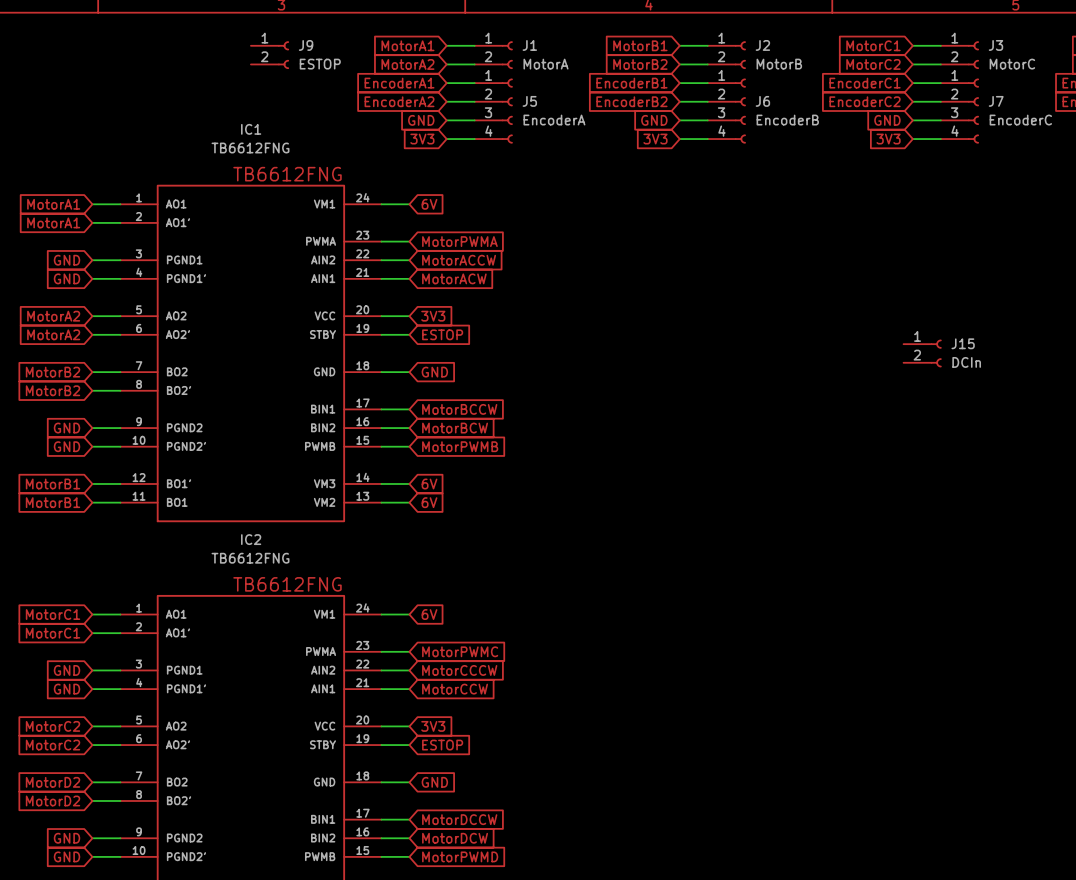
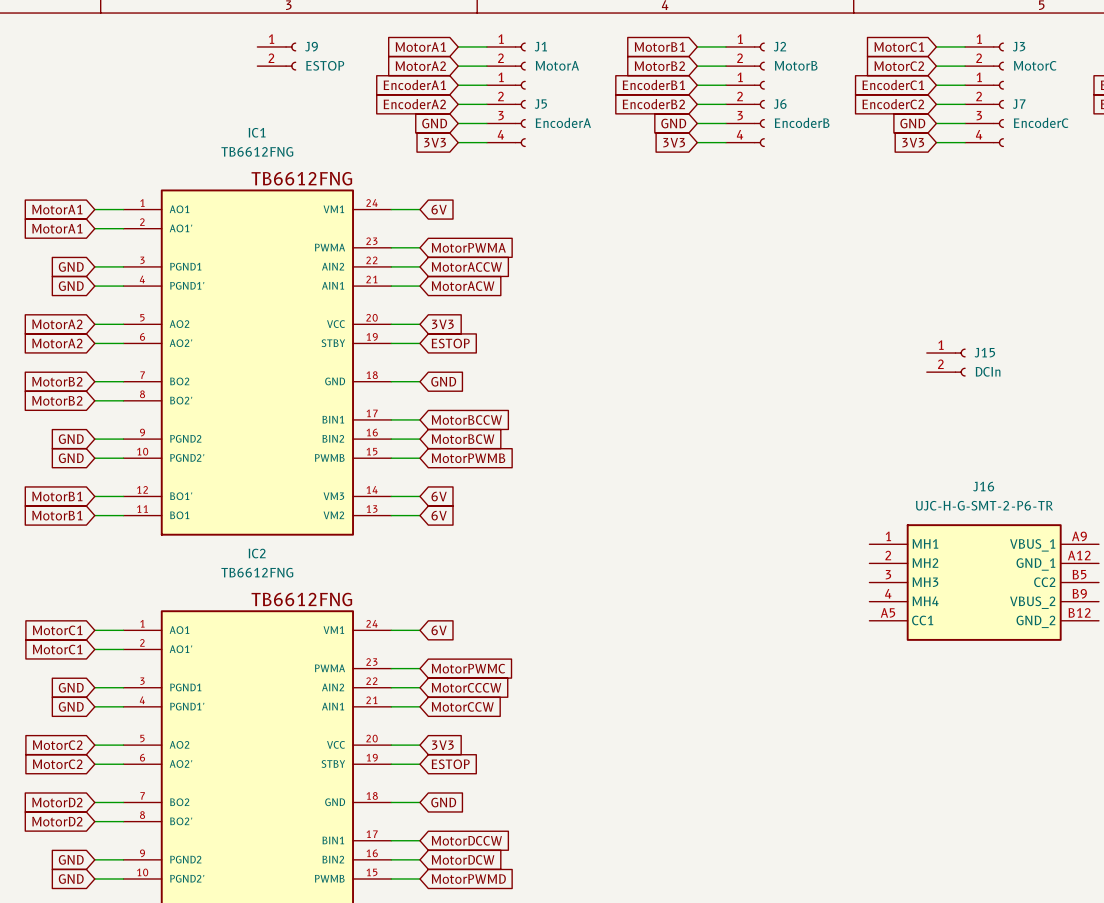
J16: none -> UJC-H-G-SMT-2-P6-TR (984, 582)

